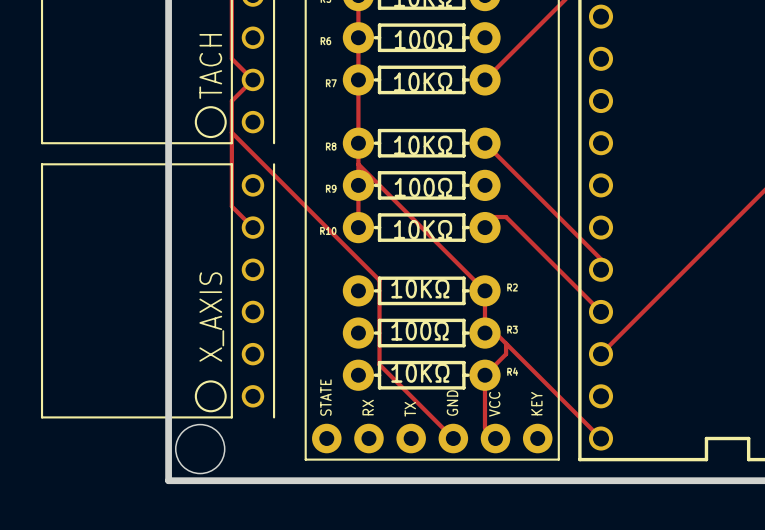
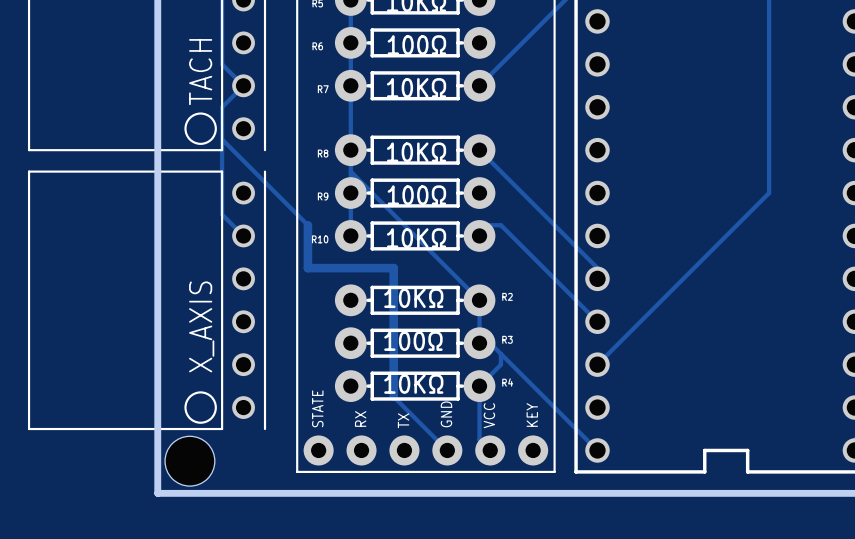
track: (316, 217) (379, 280) (379, 364) (400, 385) -> (307, 225) (307, 268) (393, 268) (393, 396)

